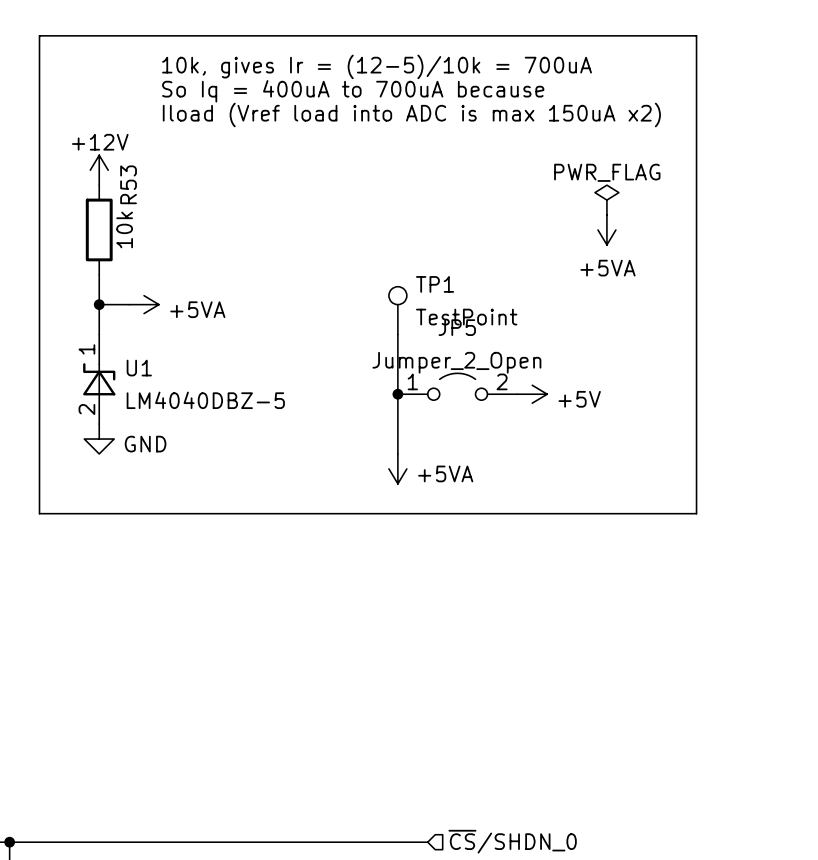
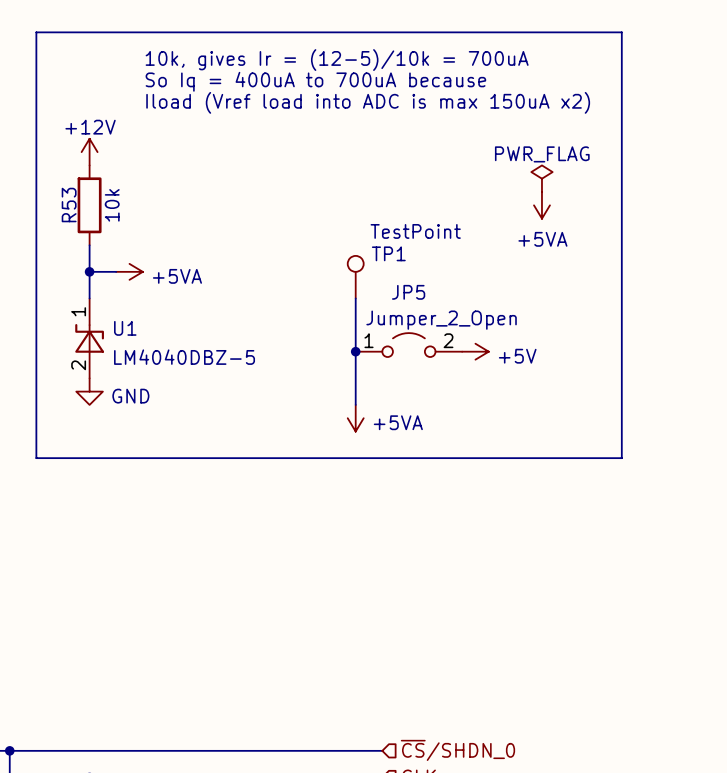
R53 name position: R53 (128, 184) -> R53 (69, 205)
TP1 value position: TestPoint (466, 317) -> TestPoint (415, 231)
JP5 value position: Jumper_2_Open (456, 362) -> Jumper_2_Open (441, 320)

